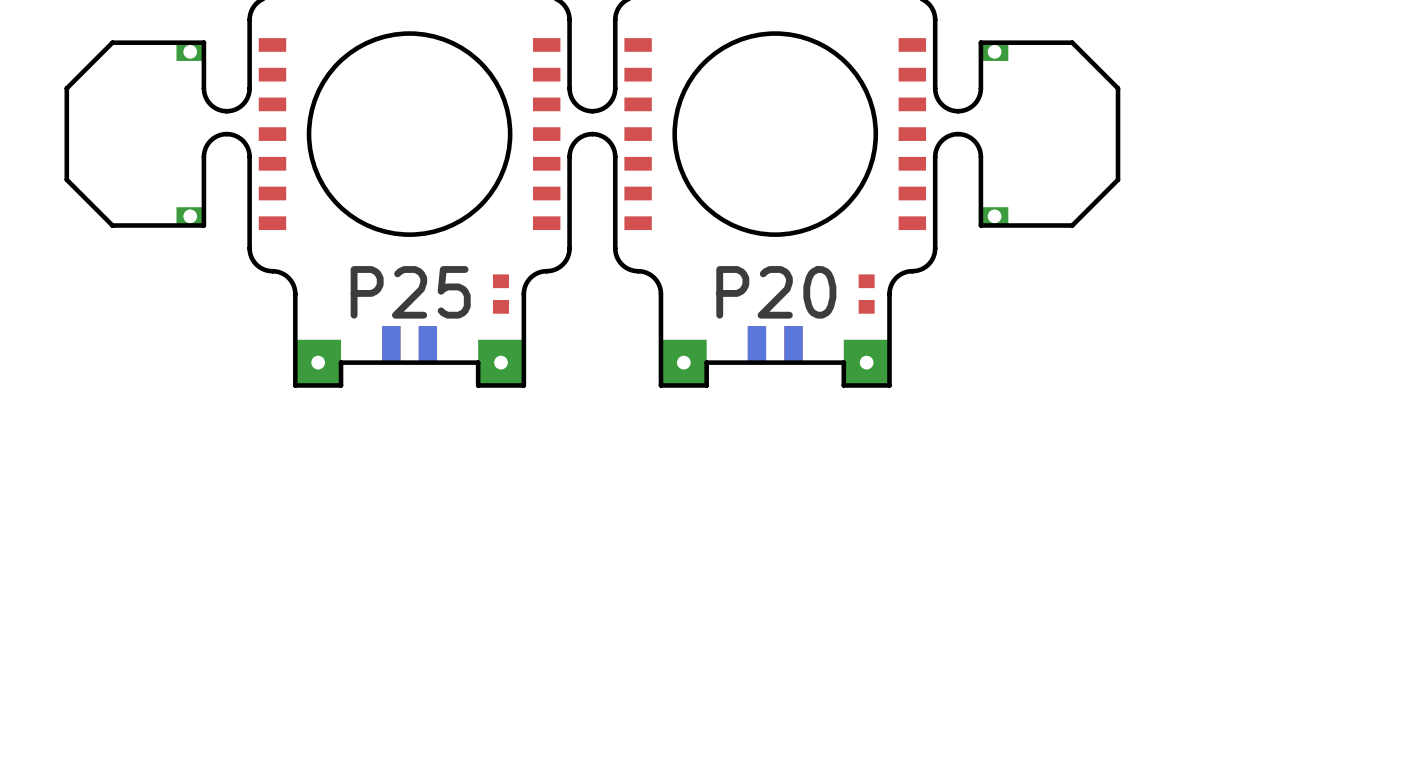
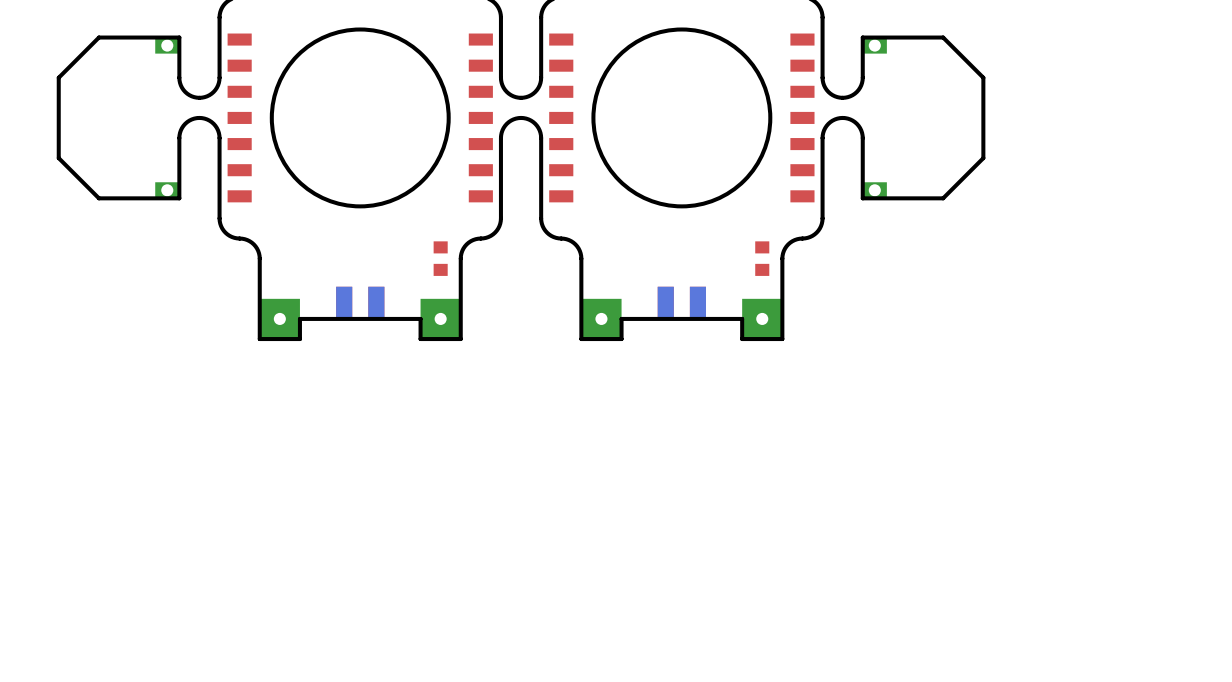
P25 name: P25 (410, 292) -> none
P20 name: P20 (776, 292) -> none

